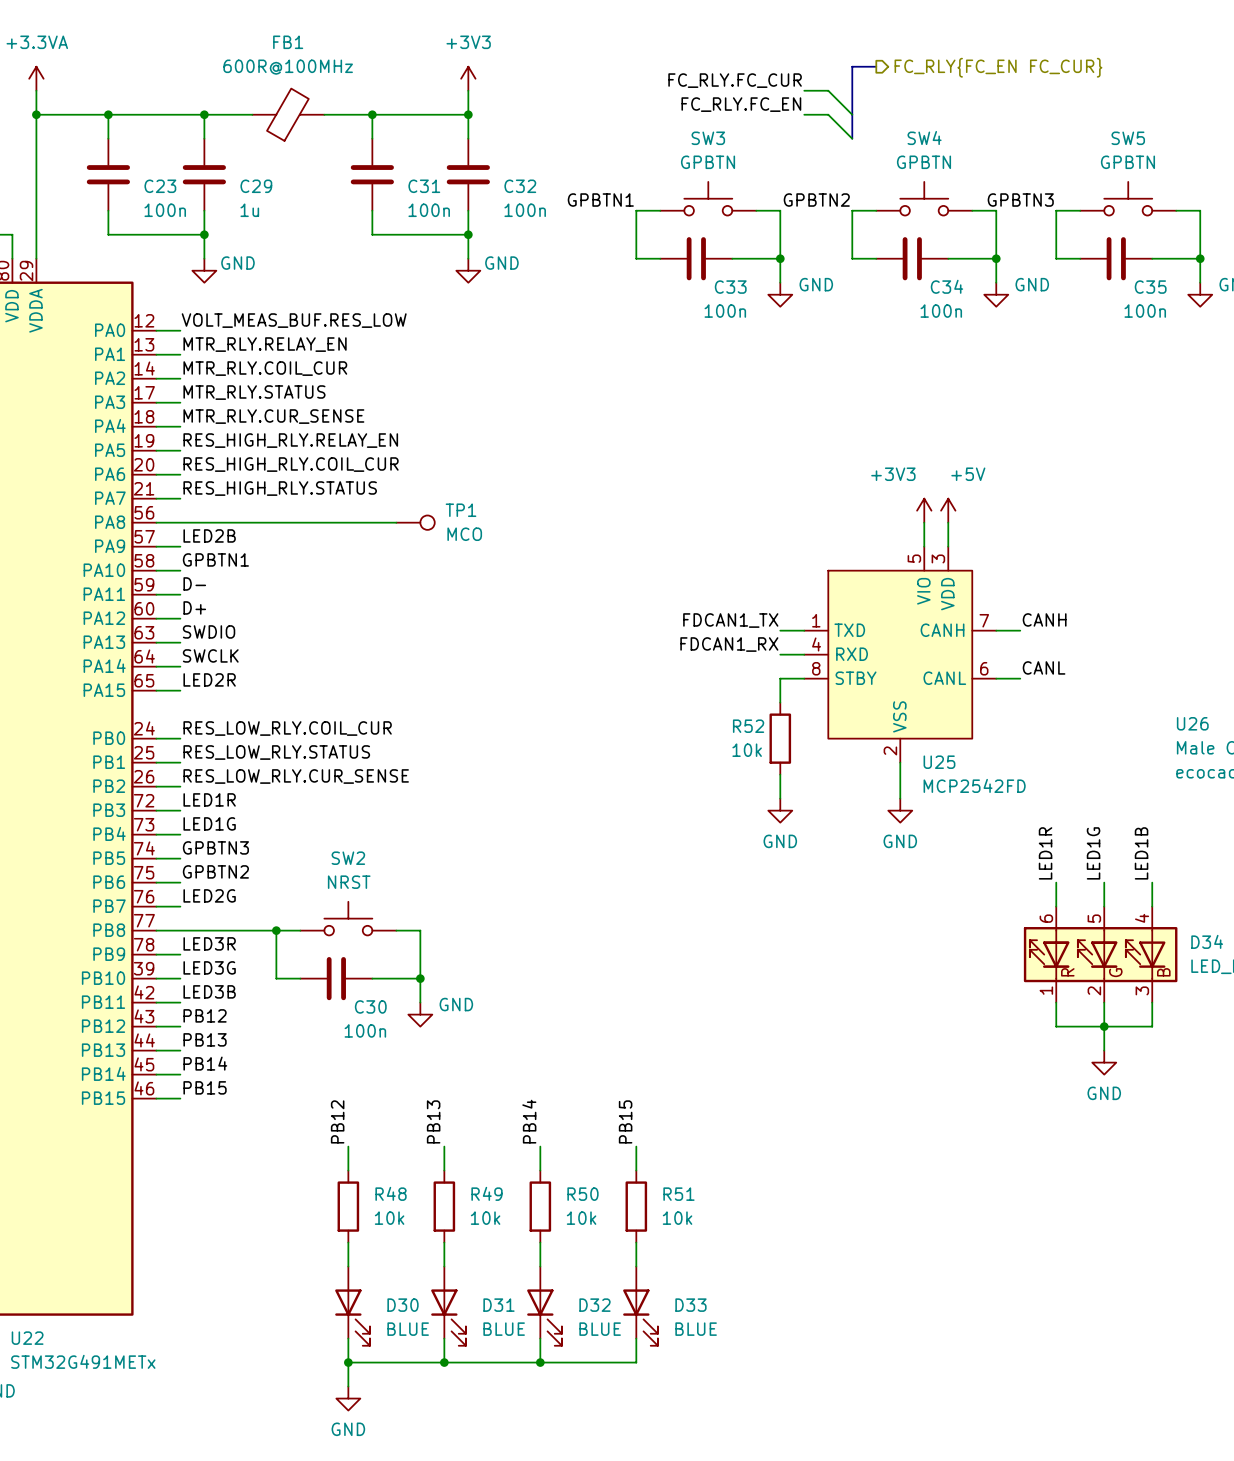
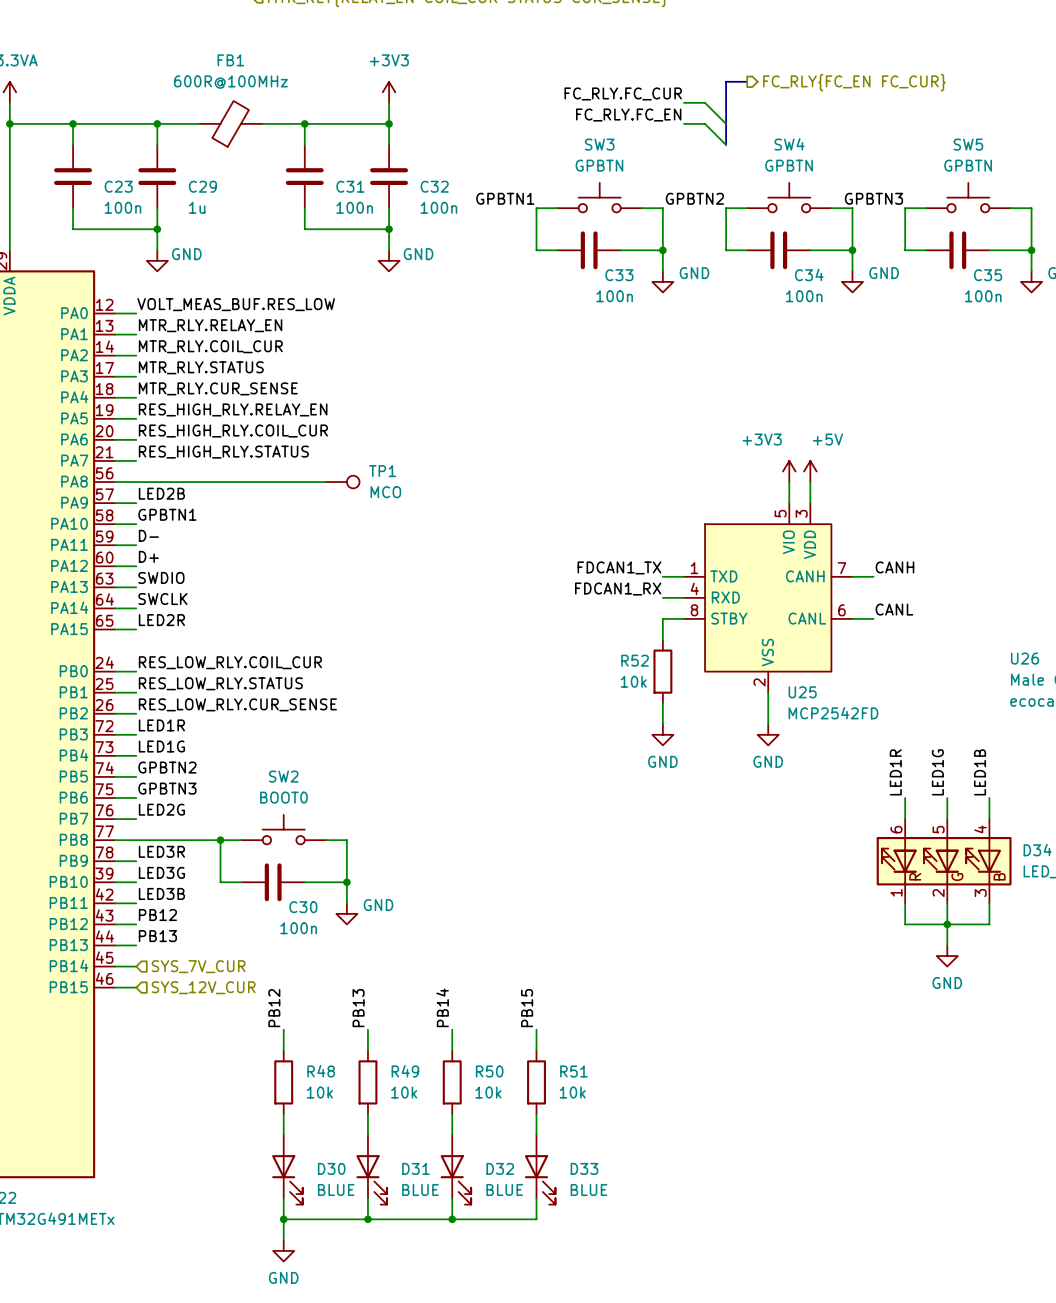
label: GPBTN3 (215, 847) -> GPBTN2 (167, 767)
label: GPBTN2 (215, 871) -> GPBTN3 (167, 788)
SW2 value: NRST (349, 882) -> BOOT0 (283, 797)
label: PB14 (205, 1063) -> none
hierarchical label: none -> SYS_7V_CUR (198, 966)
label: PB15 (205, 1087) -> none
hierarchical label: none -> SYS_12V_CUR (203, 987)

